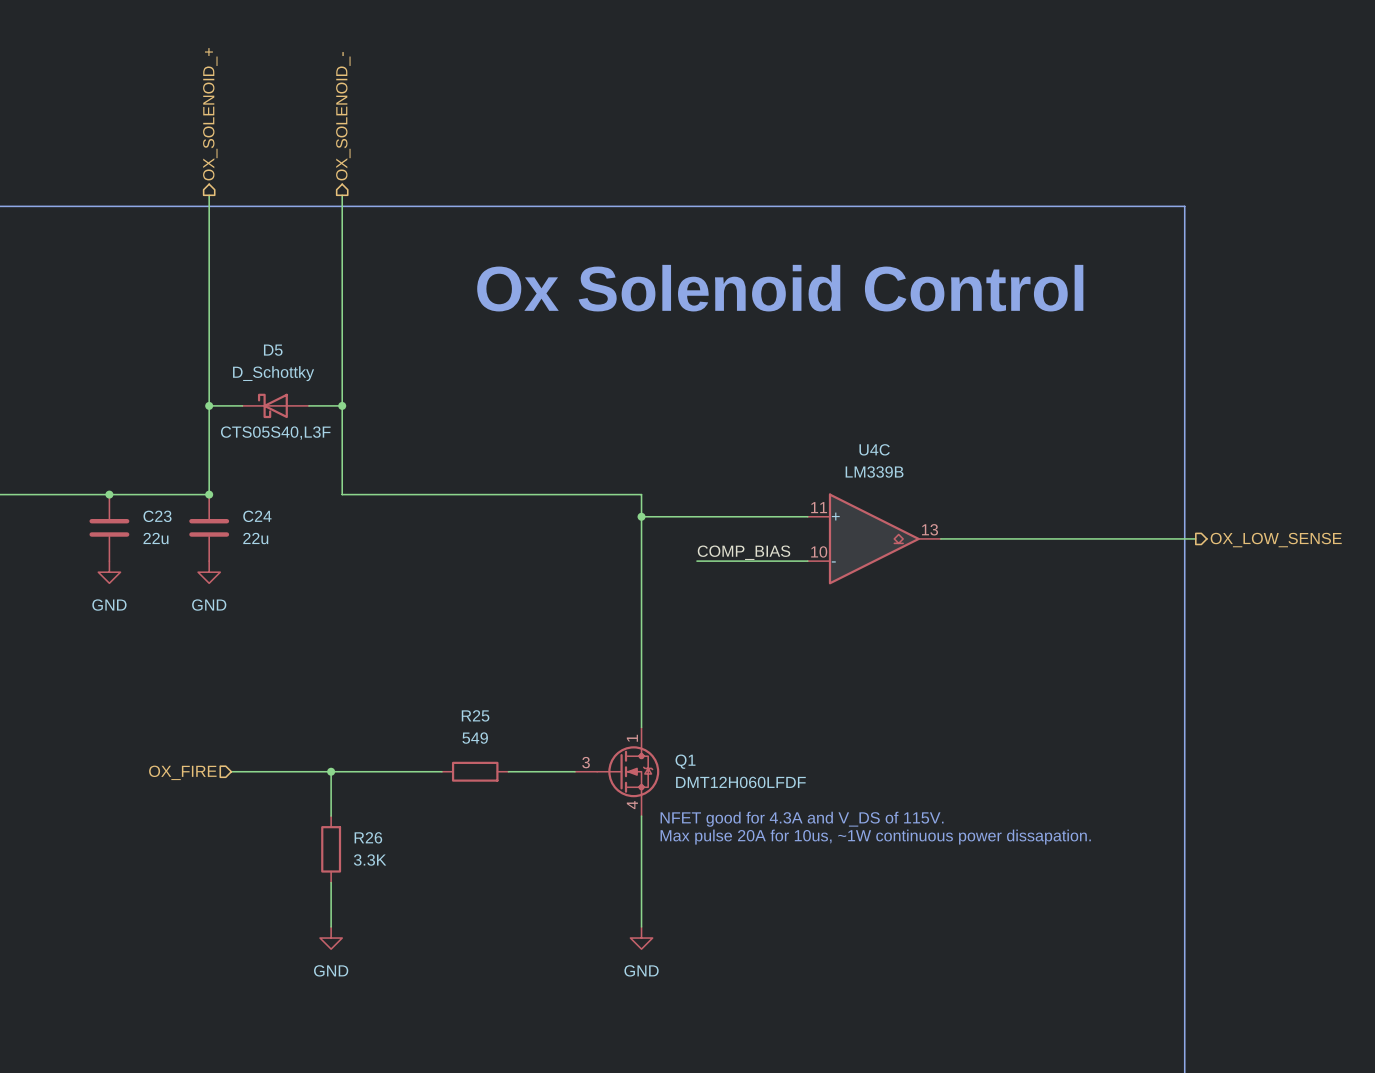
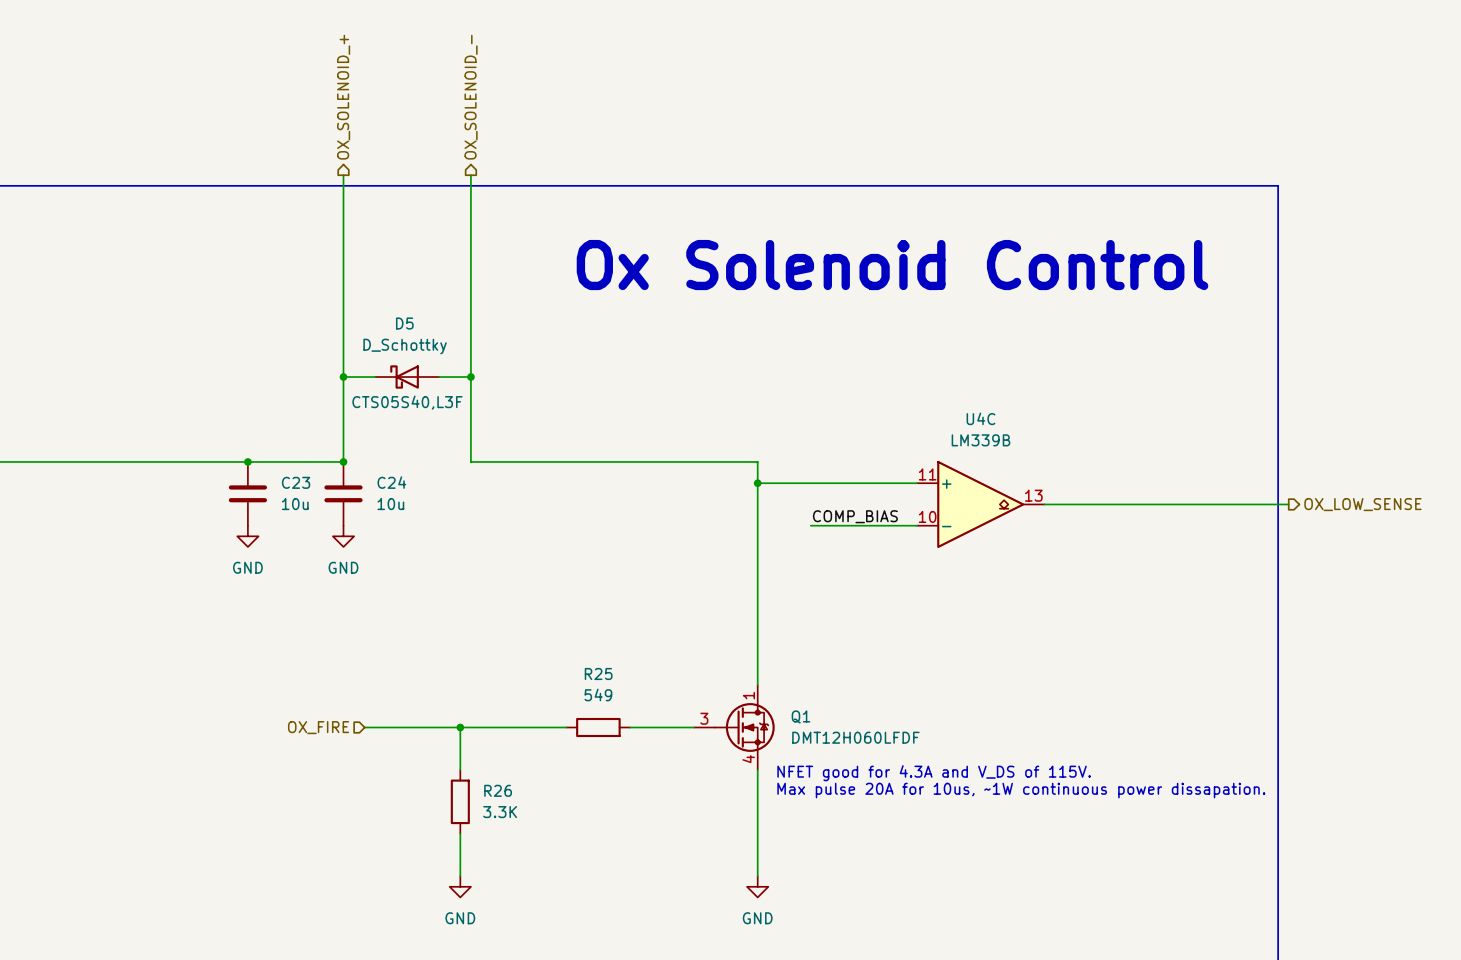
C23 value: 22u (155, 538) -> 10u (295, 504)
C24 value: 22u (255, 538) -> 10u (390, 504)

